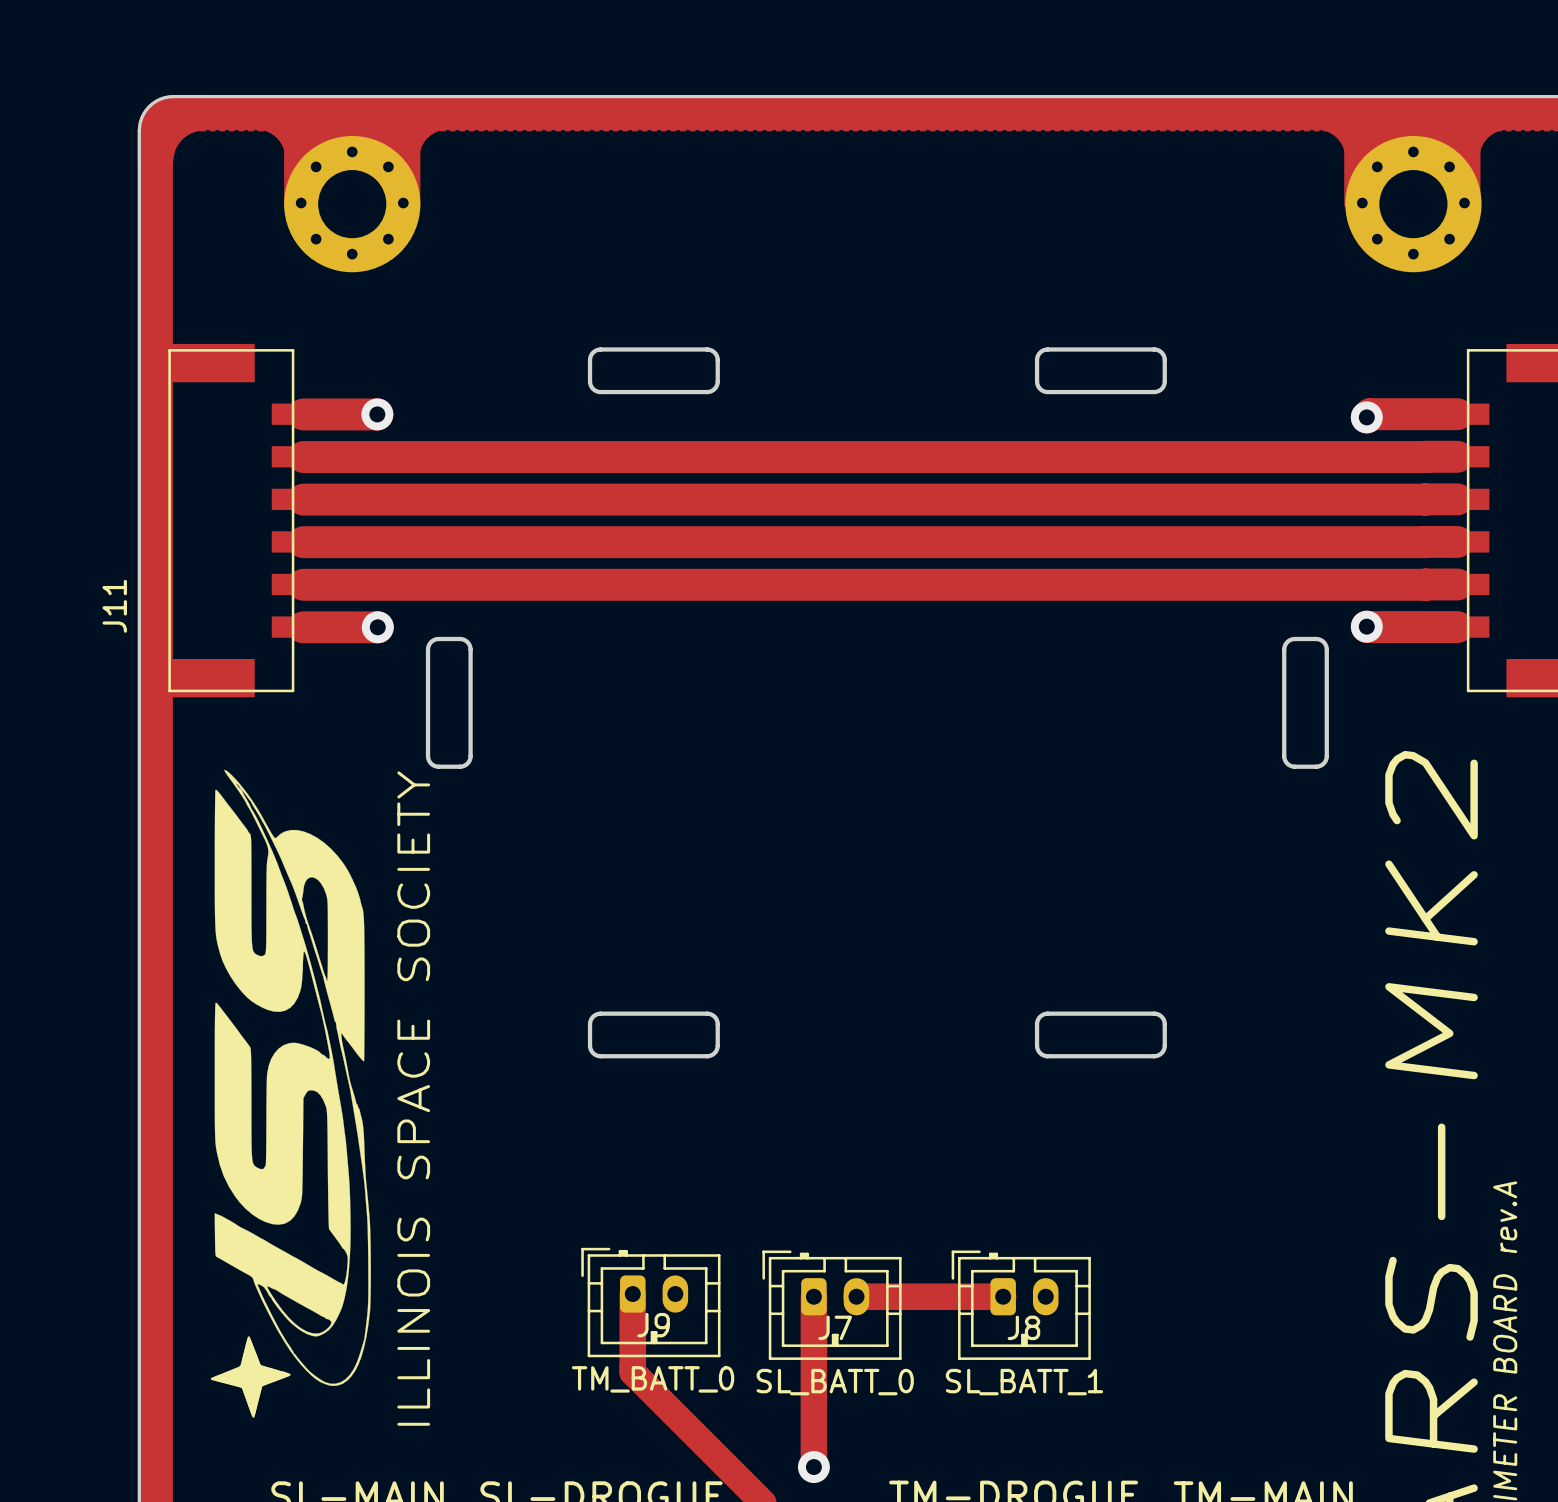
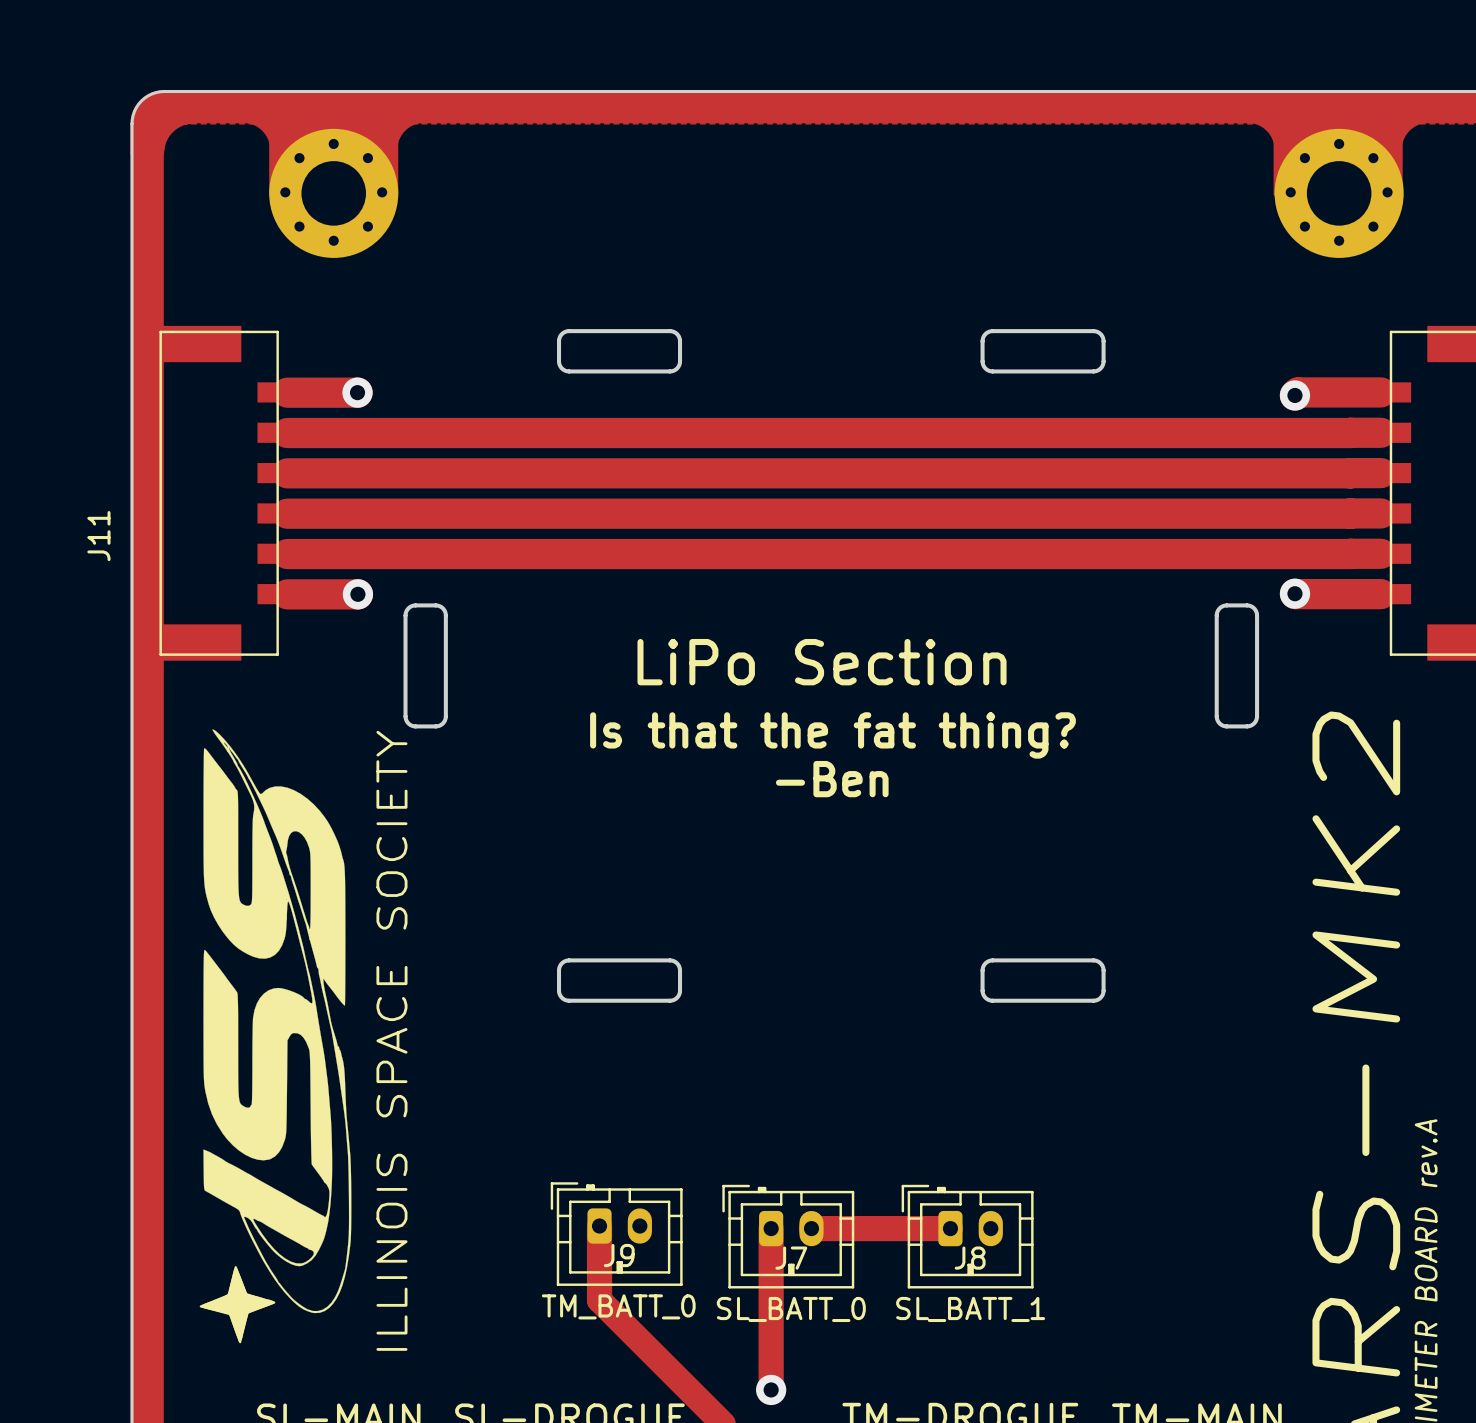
J11 name position: J11 (114, 606) -> J11 (98, 536)
text: none -> LiPo Section (822, 662)
text: none -> Is that the fat thing? (832, 735)
text: none -> -Ben (832, 779)

